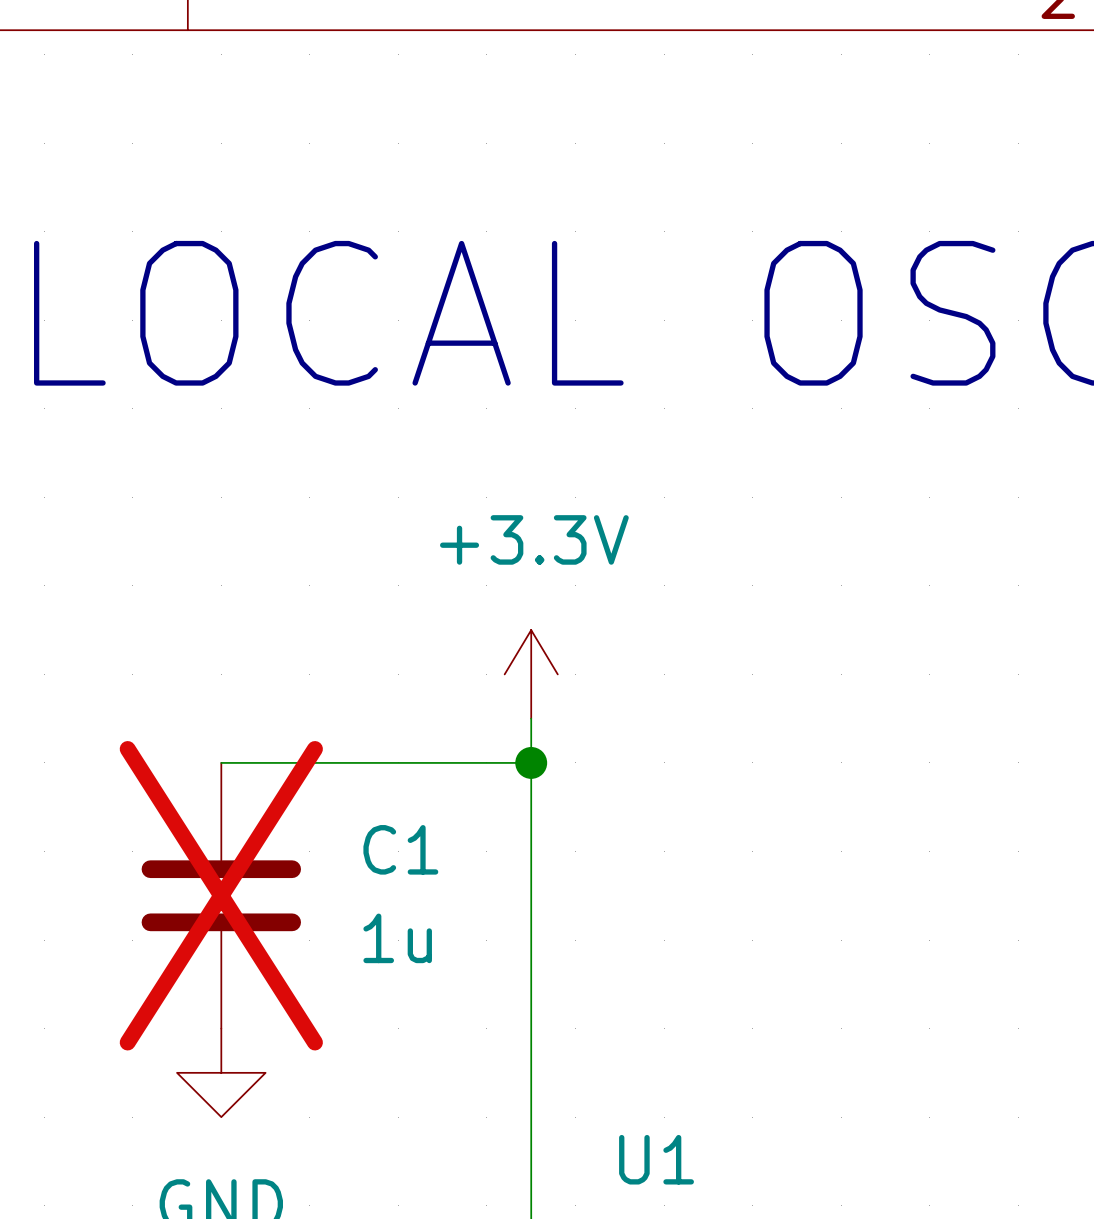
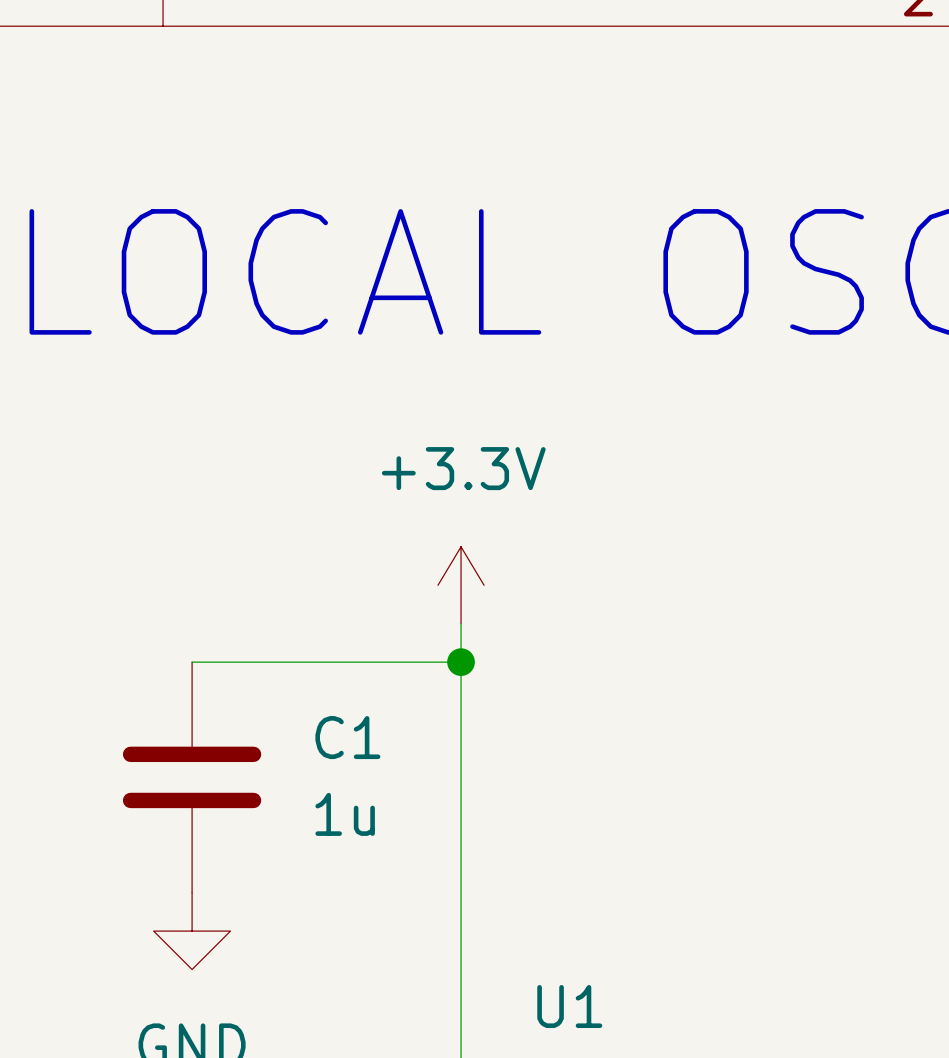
C1 do-not-place cross: (221, 895) -> none

